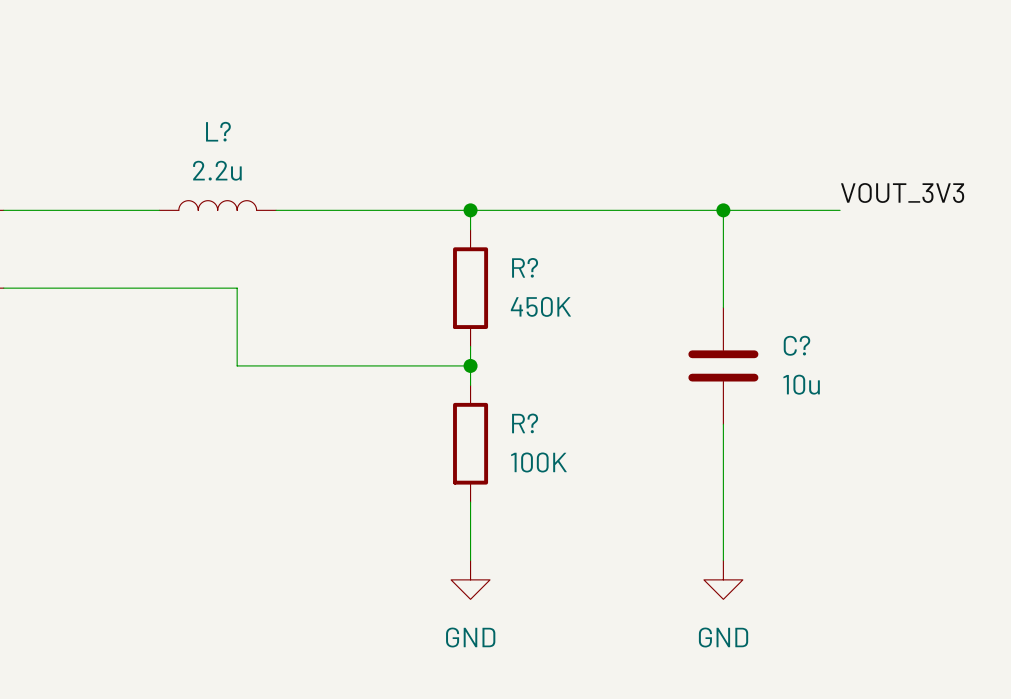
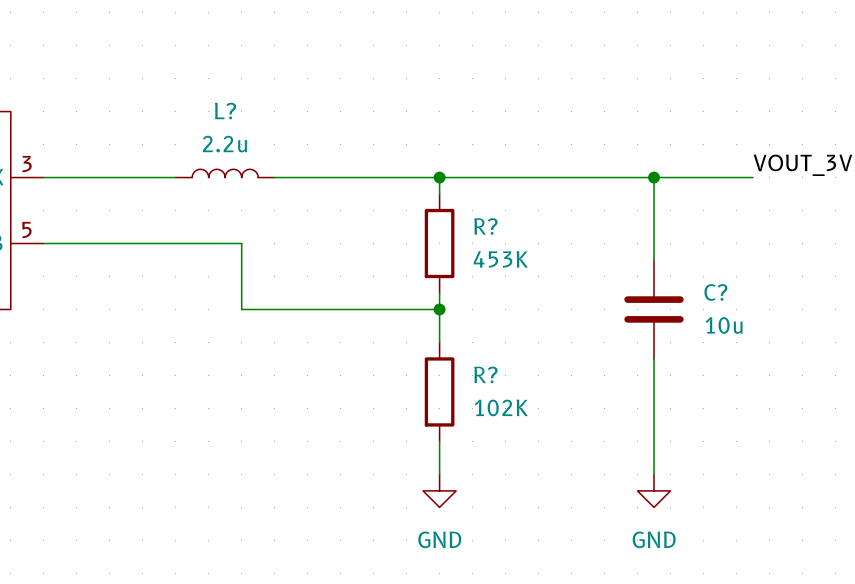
R? value: 450K (540, 306) -> 453K (500, 259)
R?: 100K (470, 443) -> none
R?: none -> 102K (439, 391)

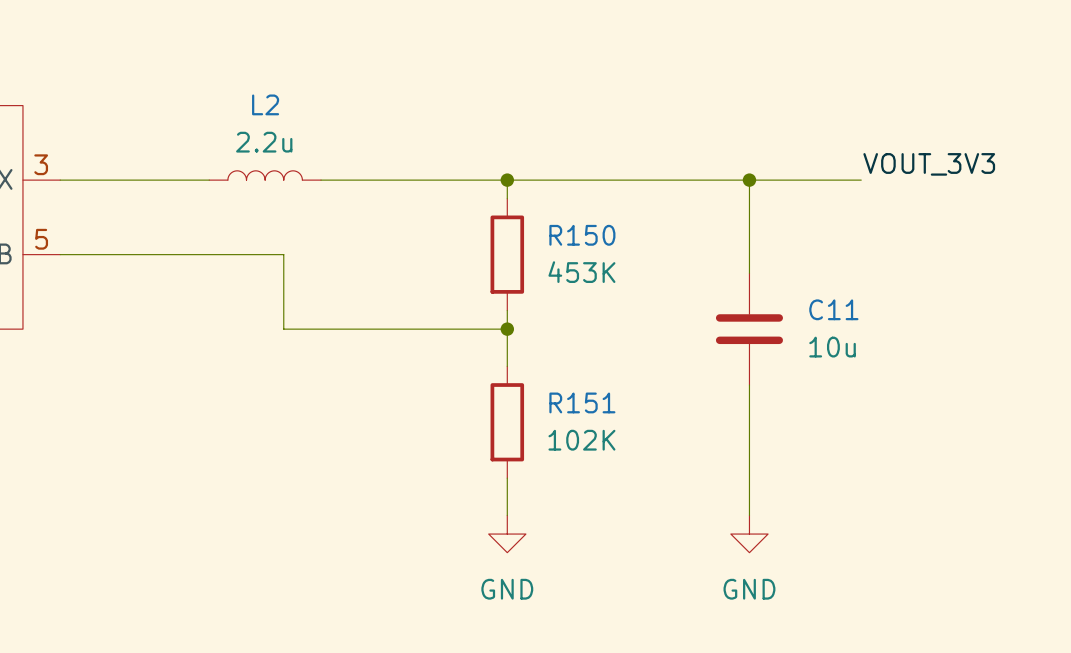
L? name: L? (225, 111) -> L2 (265, 104)
R? name: R? (485, 226) -> R150 (582, 235)
C? name: C? (715, 292) -> C11 (833, 309)
R? name: R? (485, 374) -> R151 (582, 402)

